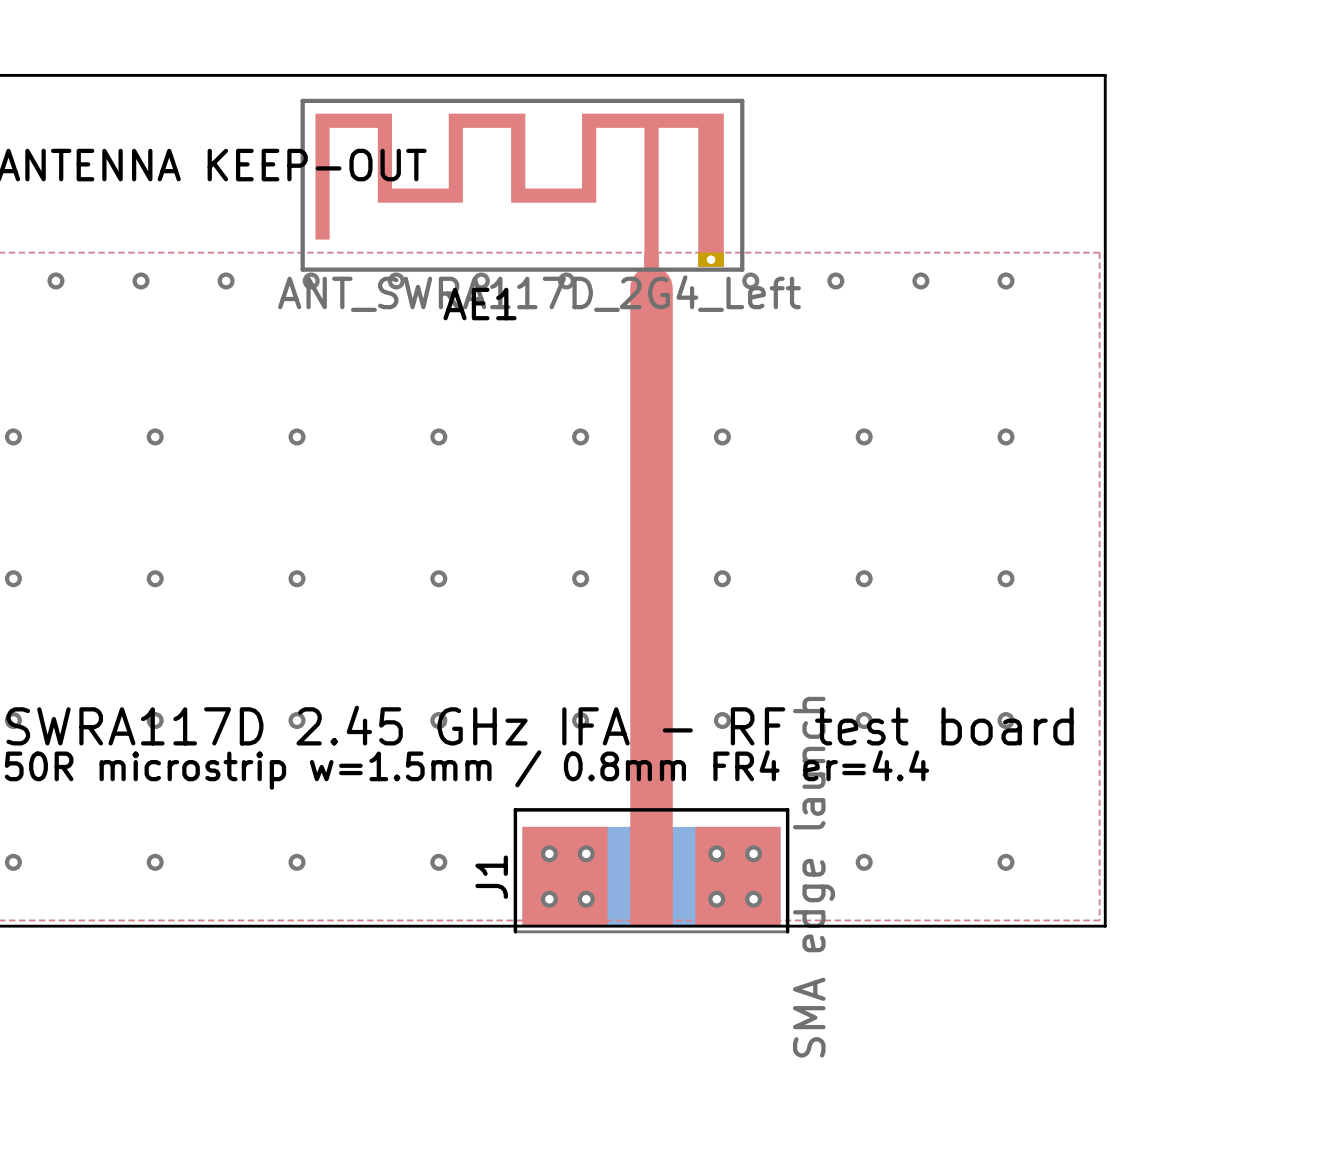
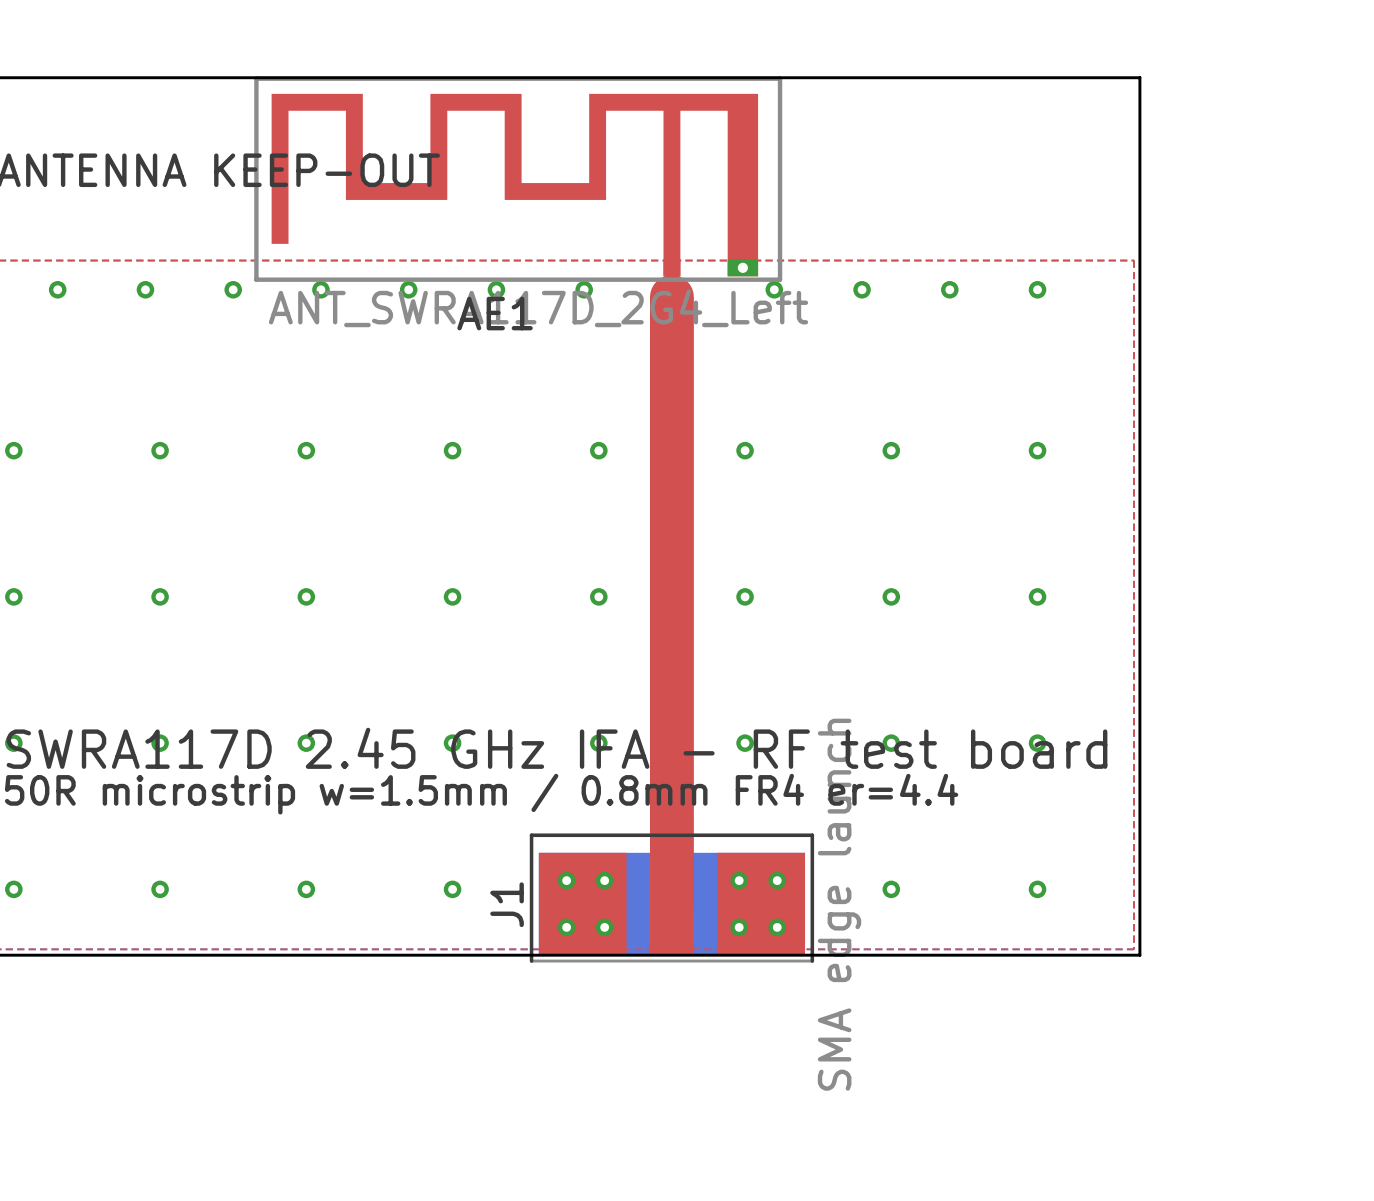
AE1 footprint: [300, 98, 745, 272] -> [254, 76, 783, 282]

